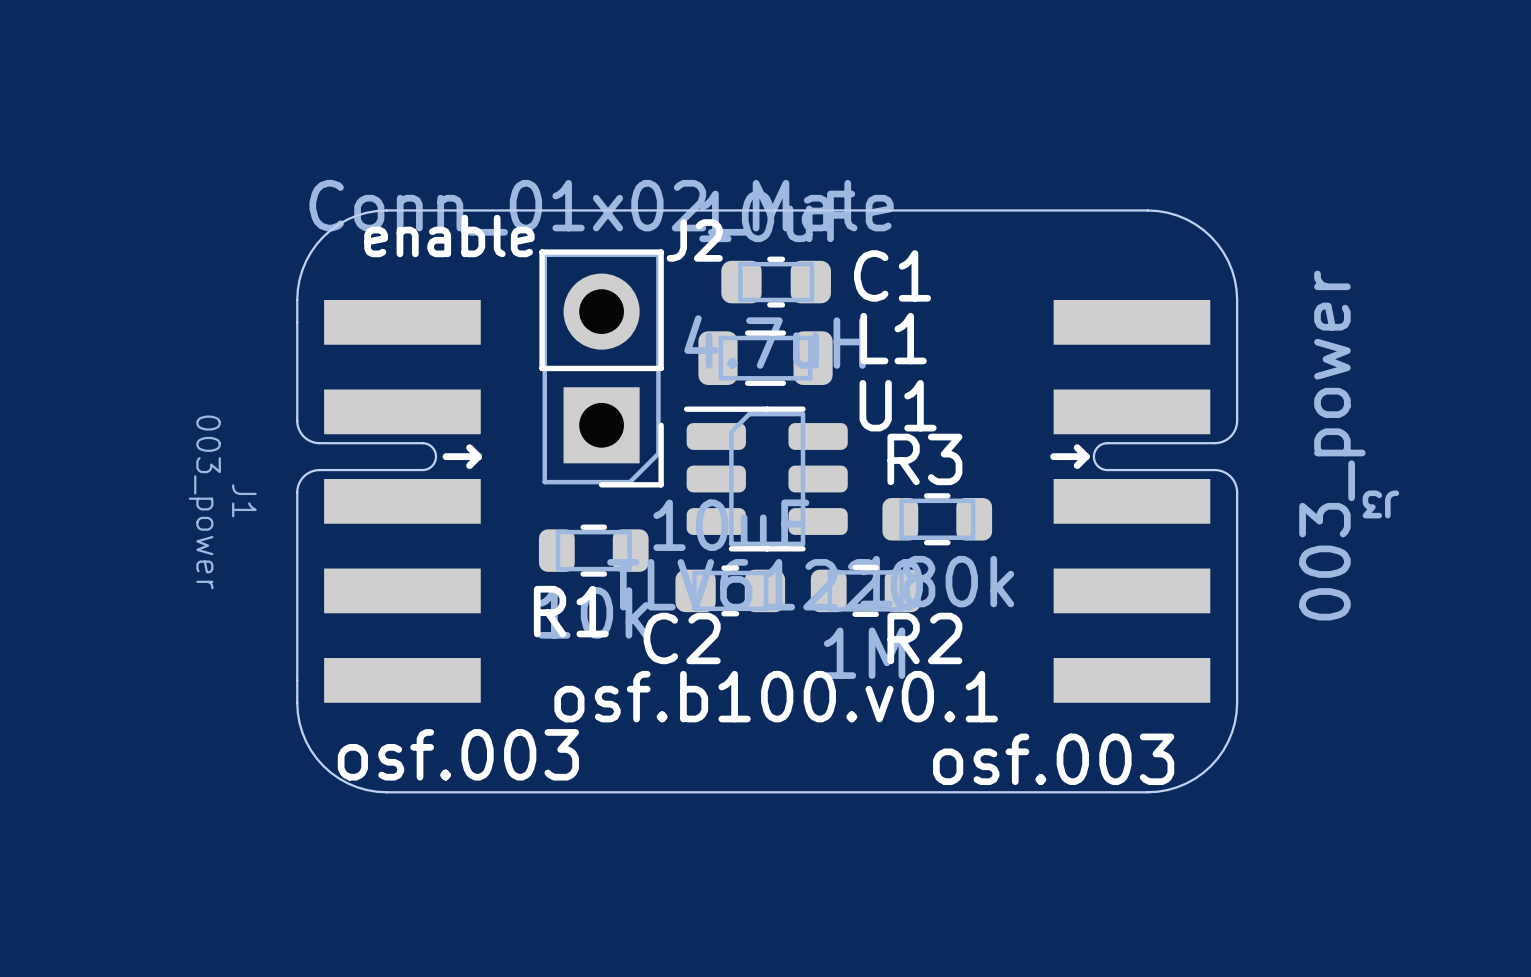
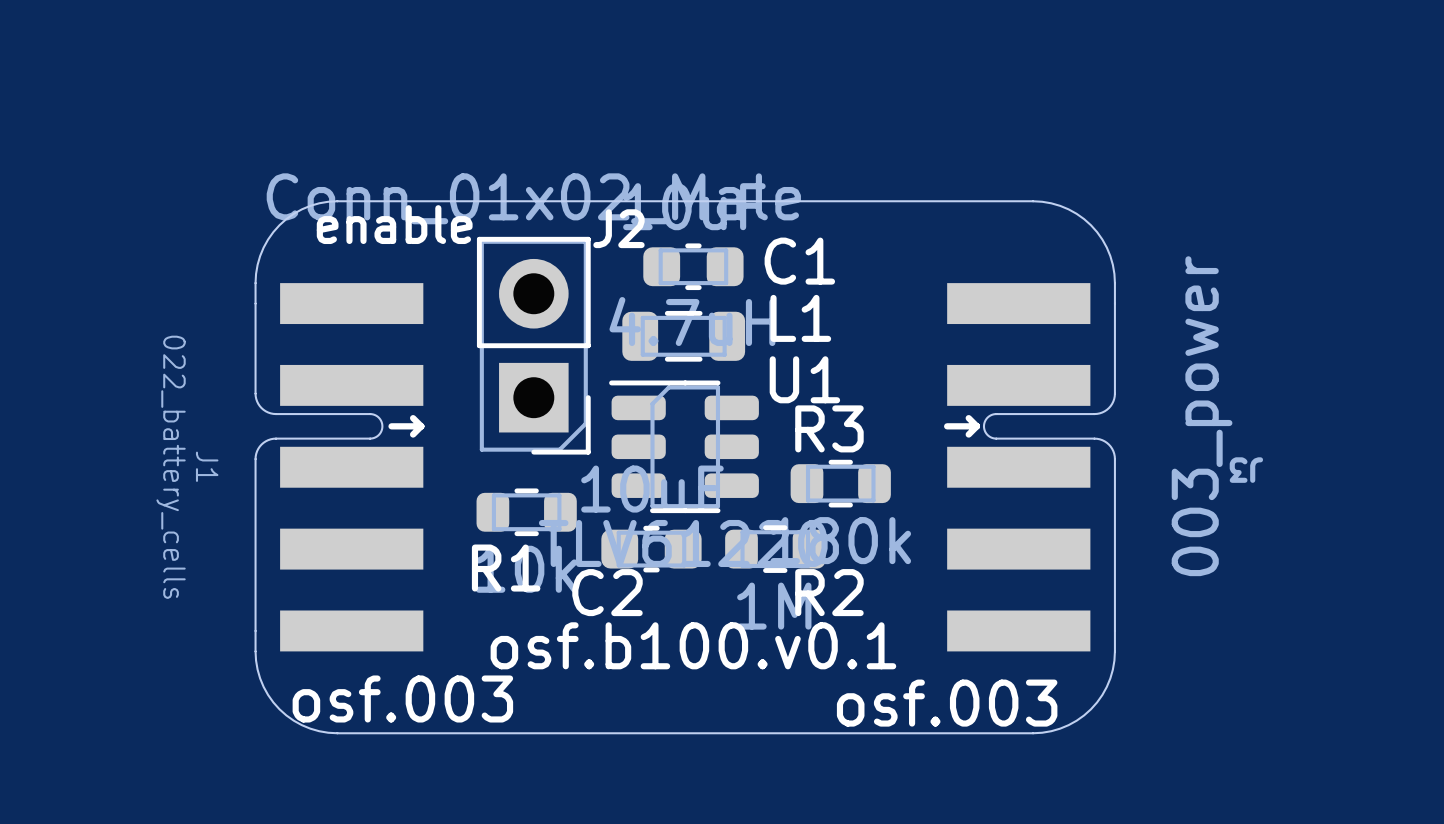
J1 value: 003_power (204, 502) -> 022_battery_cells (171, 467)

